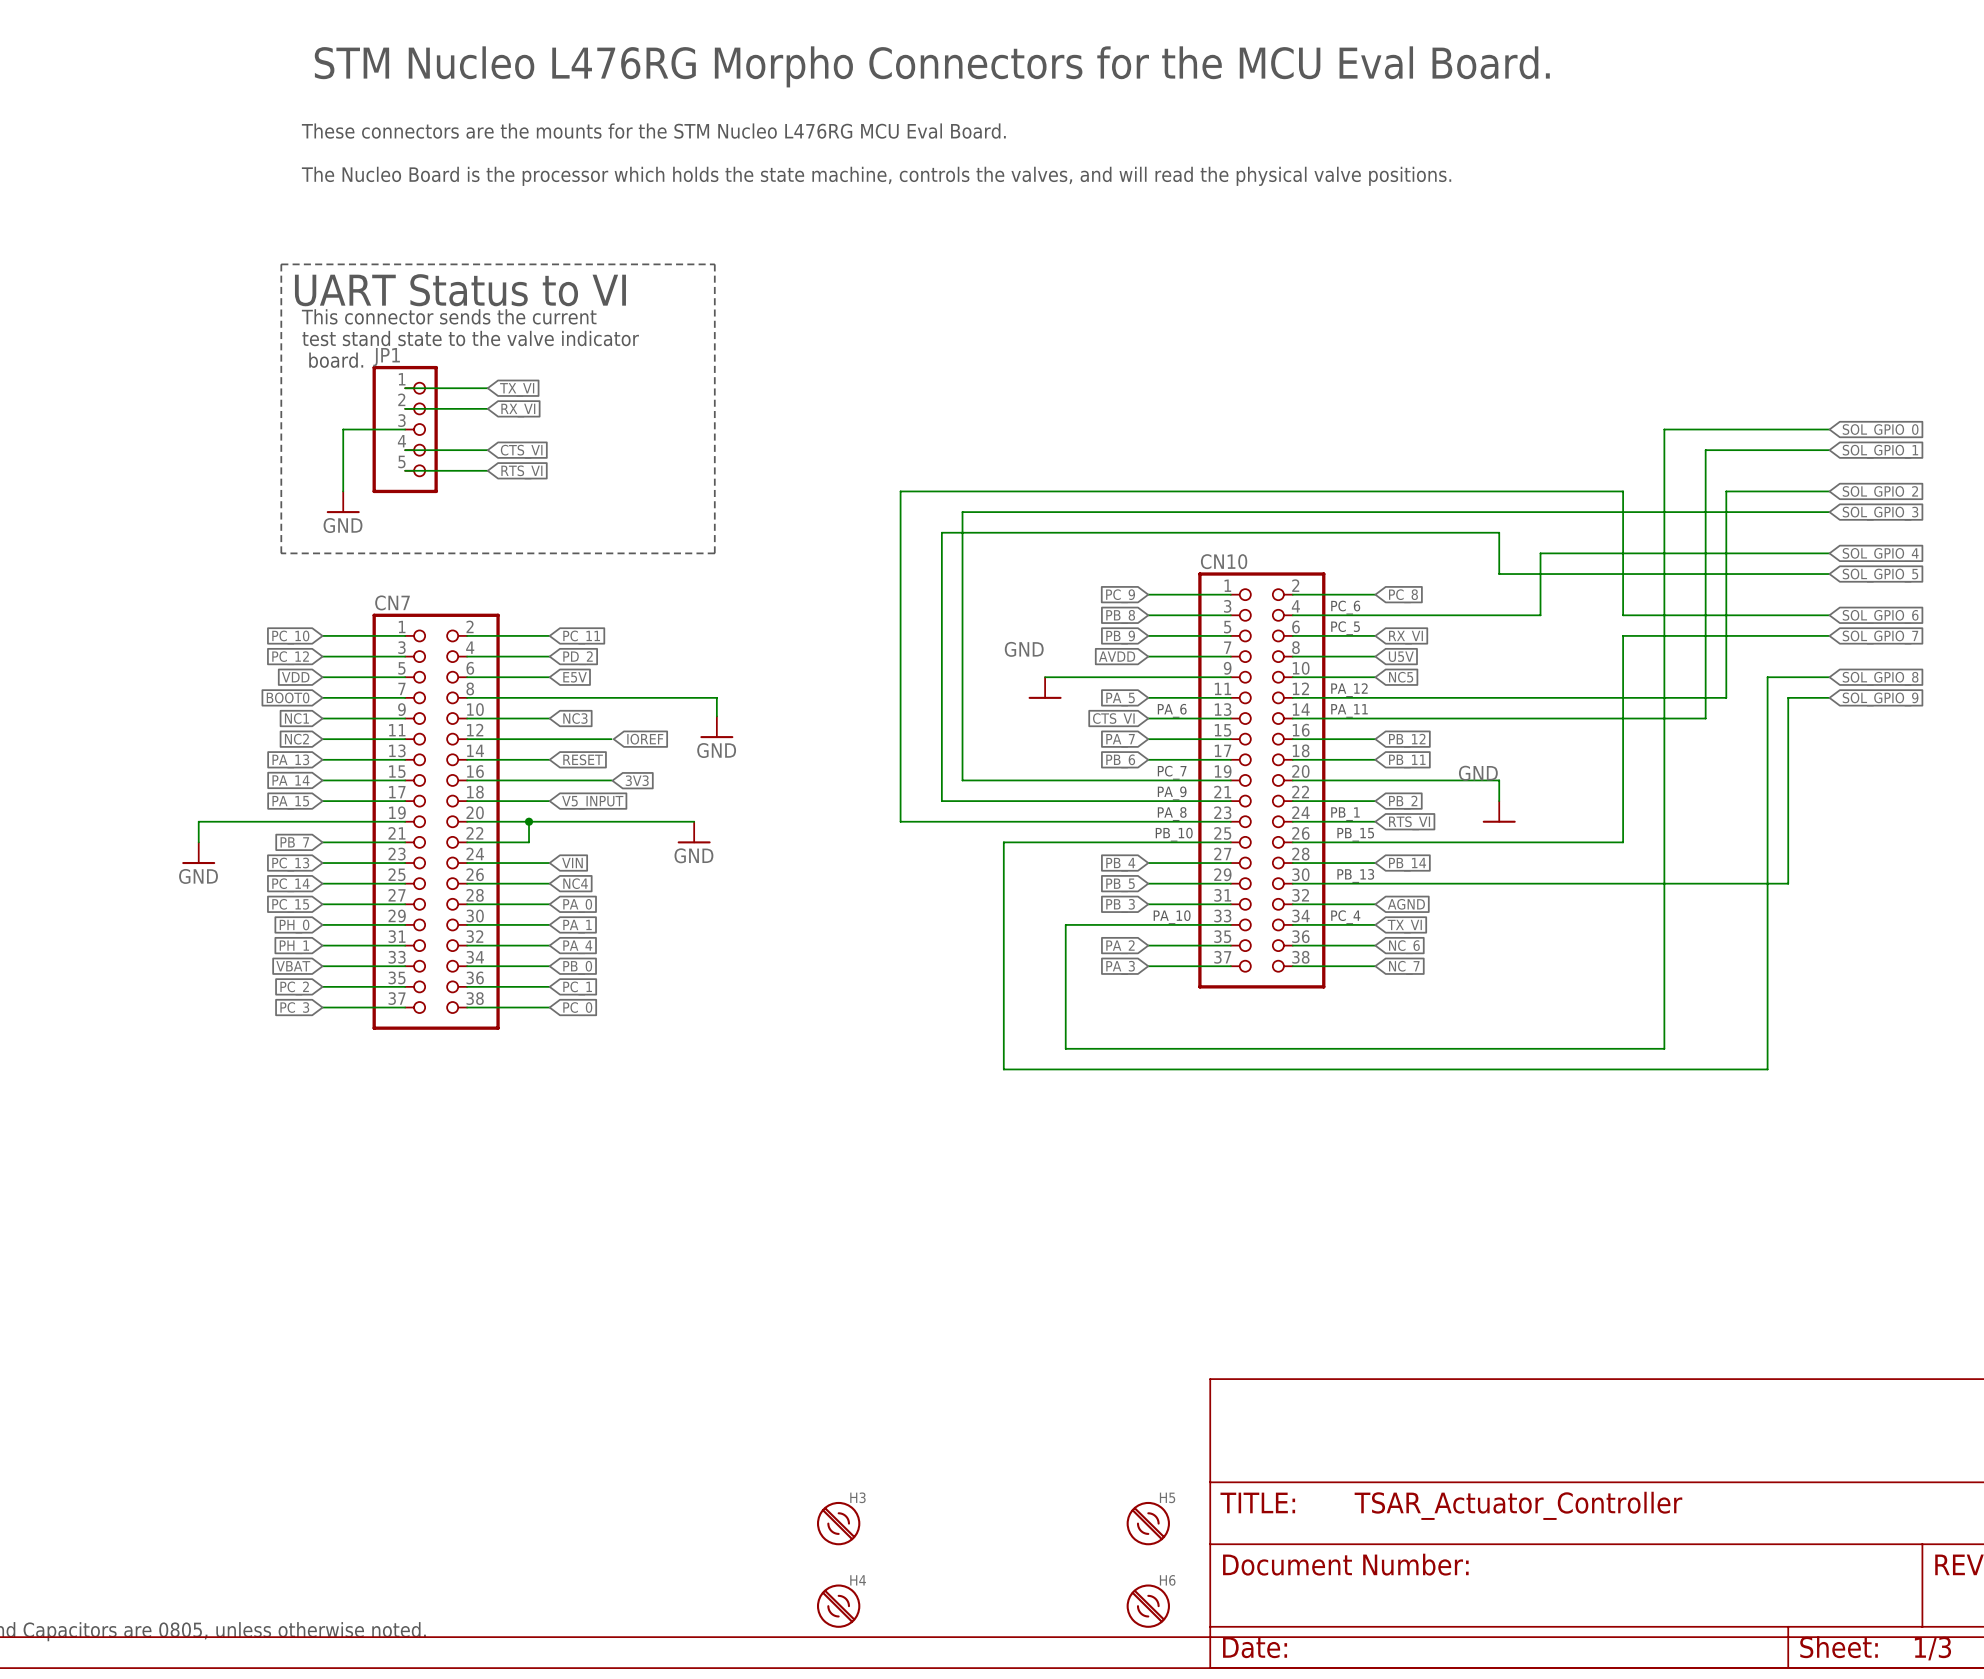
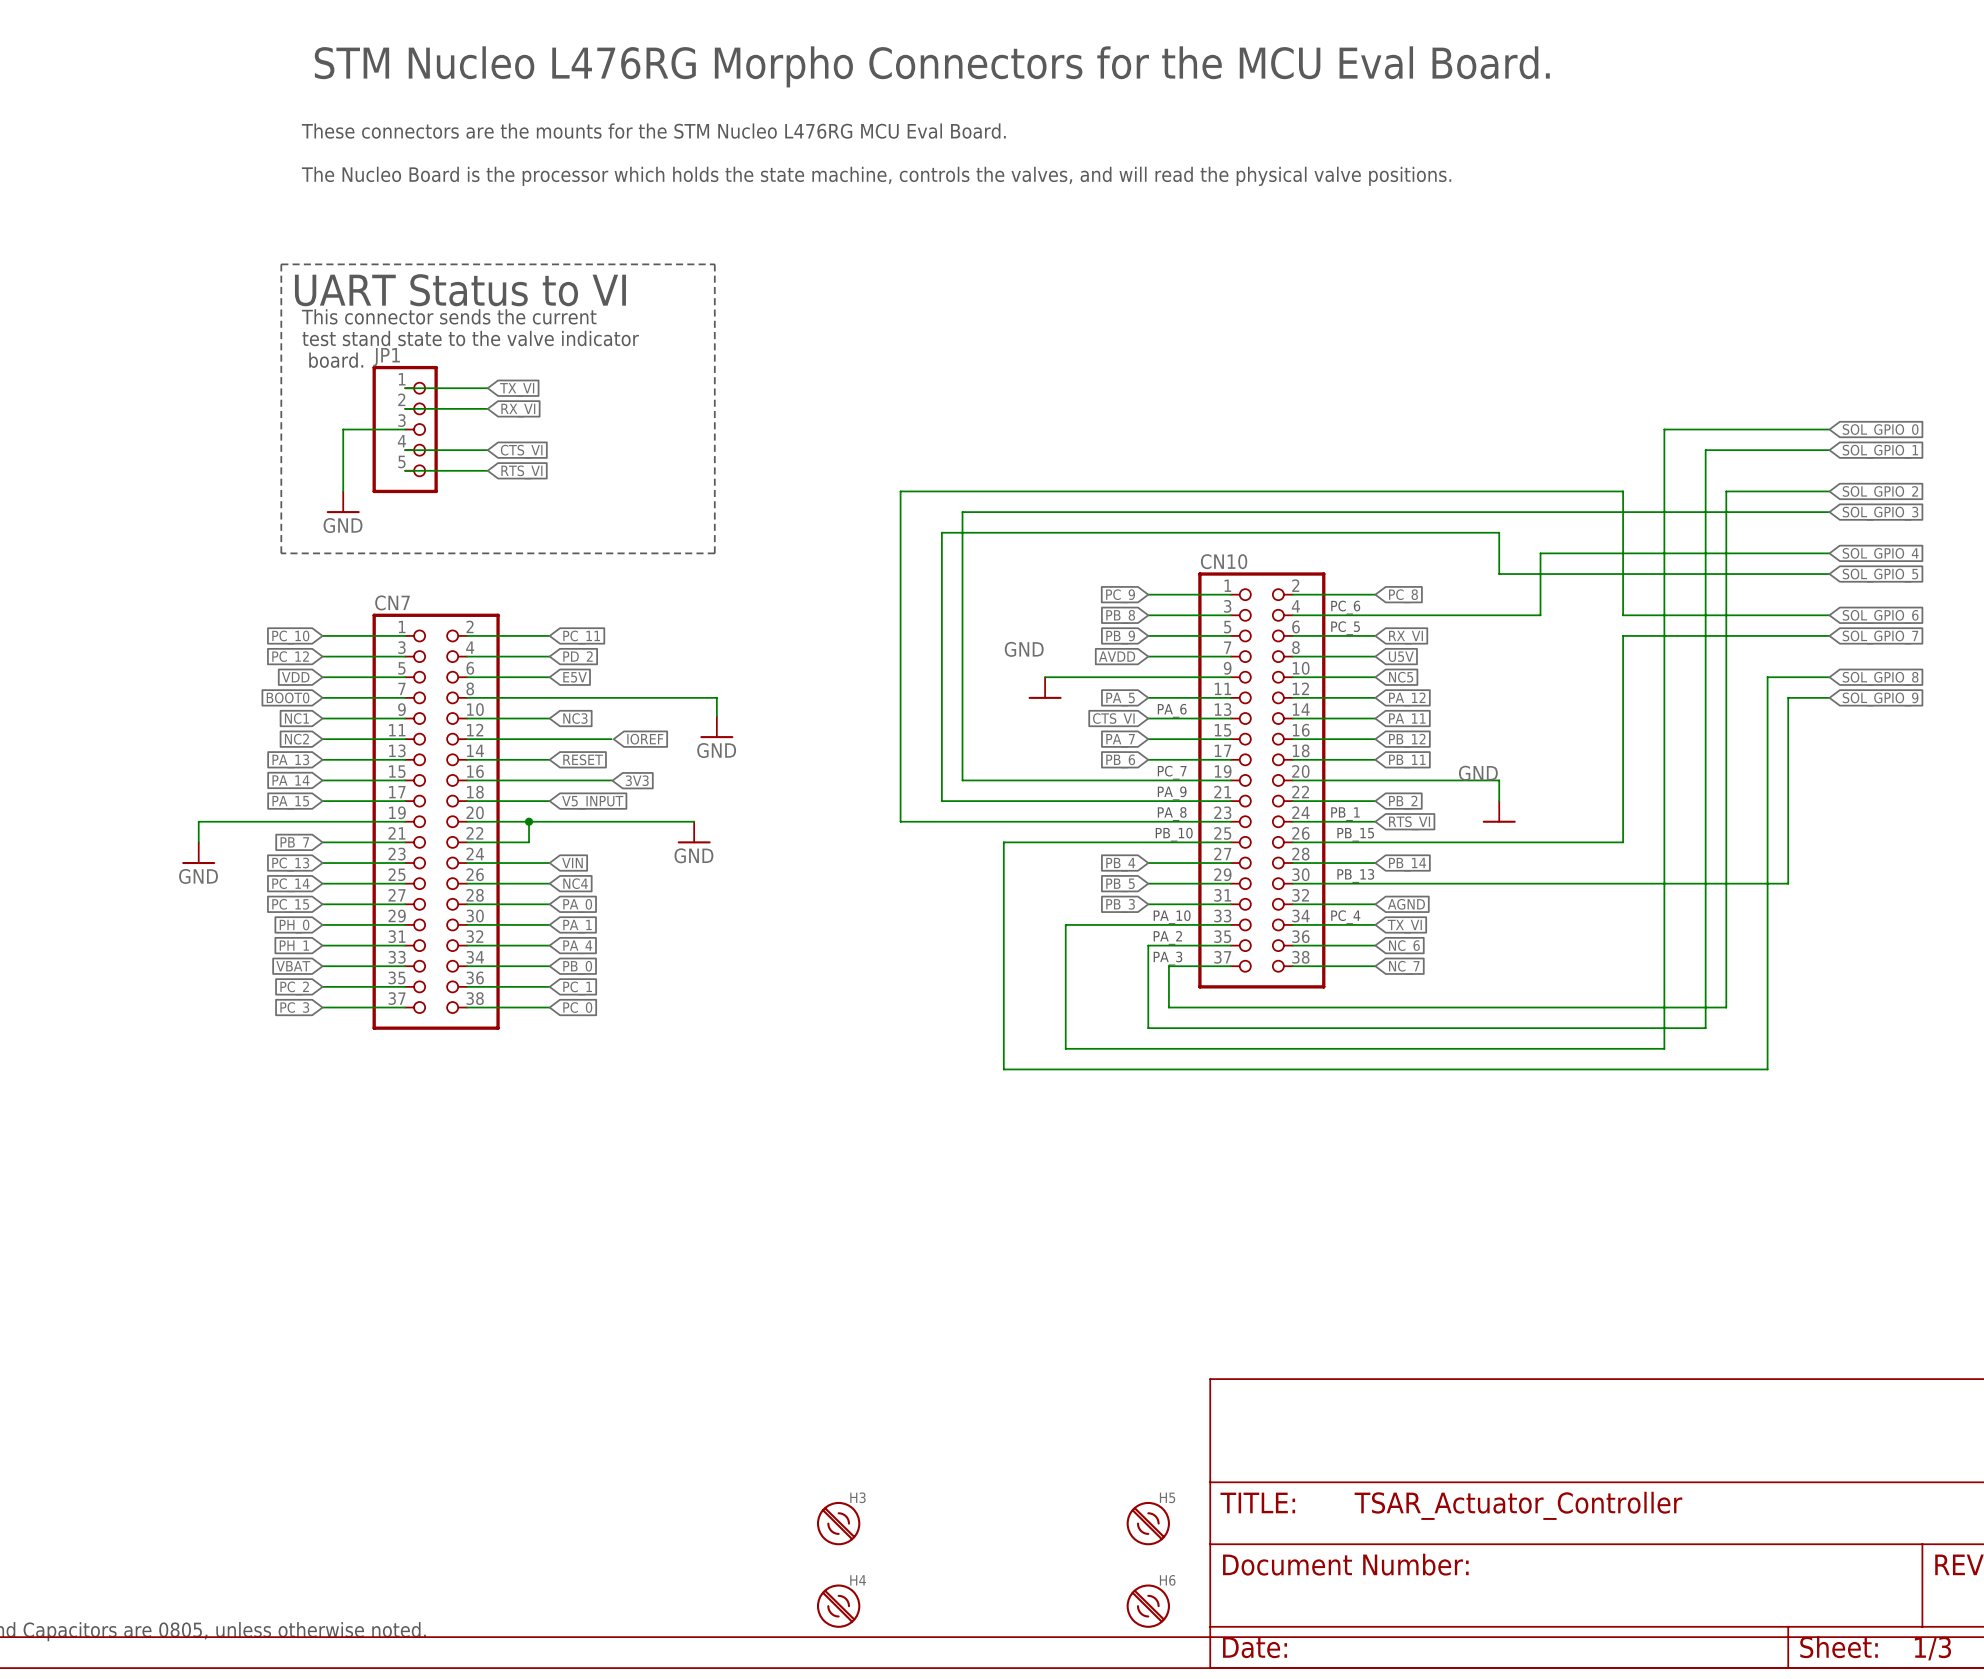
text: PA_12 (1349, 690) -> none
wire: (1375, 697) (1726, 697) -> (1168, 966) (1168, 1007) (1726, 1007) (1726, 697)
global label: none -> PA_12 (1407, 699)
text: PA_11 (1349, 710) -> none
wire: (1375, 718) (1705, 718) -> (1148, 945) (1148, 1028) (1705, 1028) (1705, 718)
global label: none -> PA_11 (1407, 720)
text: none -> PA_2 (1167, 937)
global label: PA_2 (1120, 947) -> none
text: none -> PA_3 (1167, 958)
wire: (1148, 966) (1168, 966) -> none
global label: PA_3 (1120, 967) -> none

